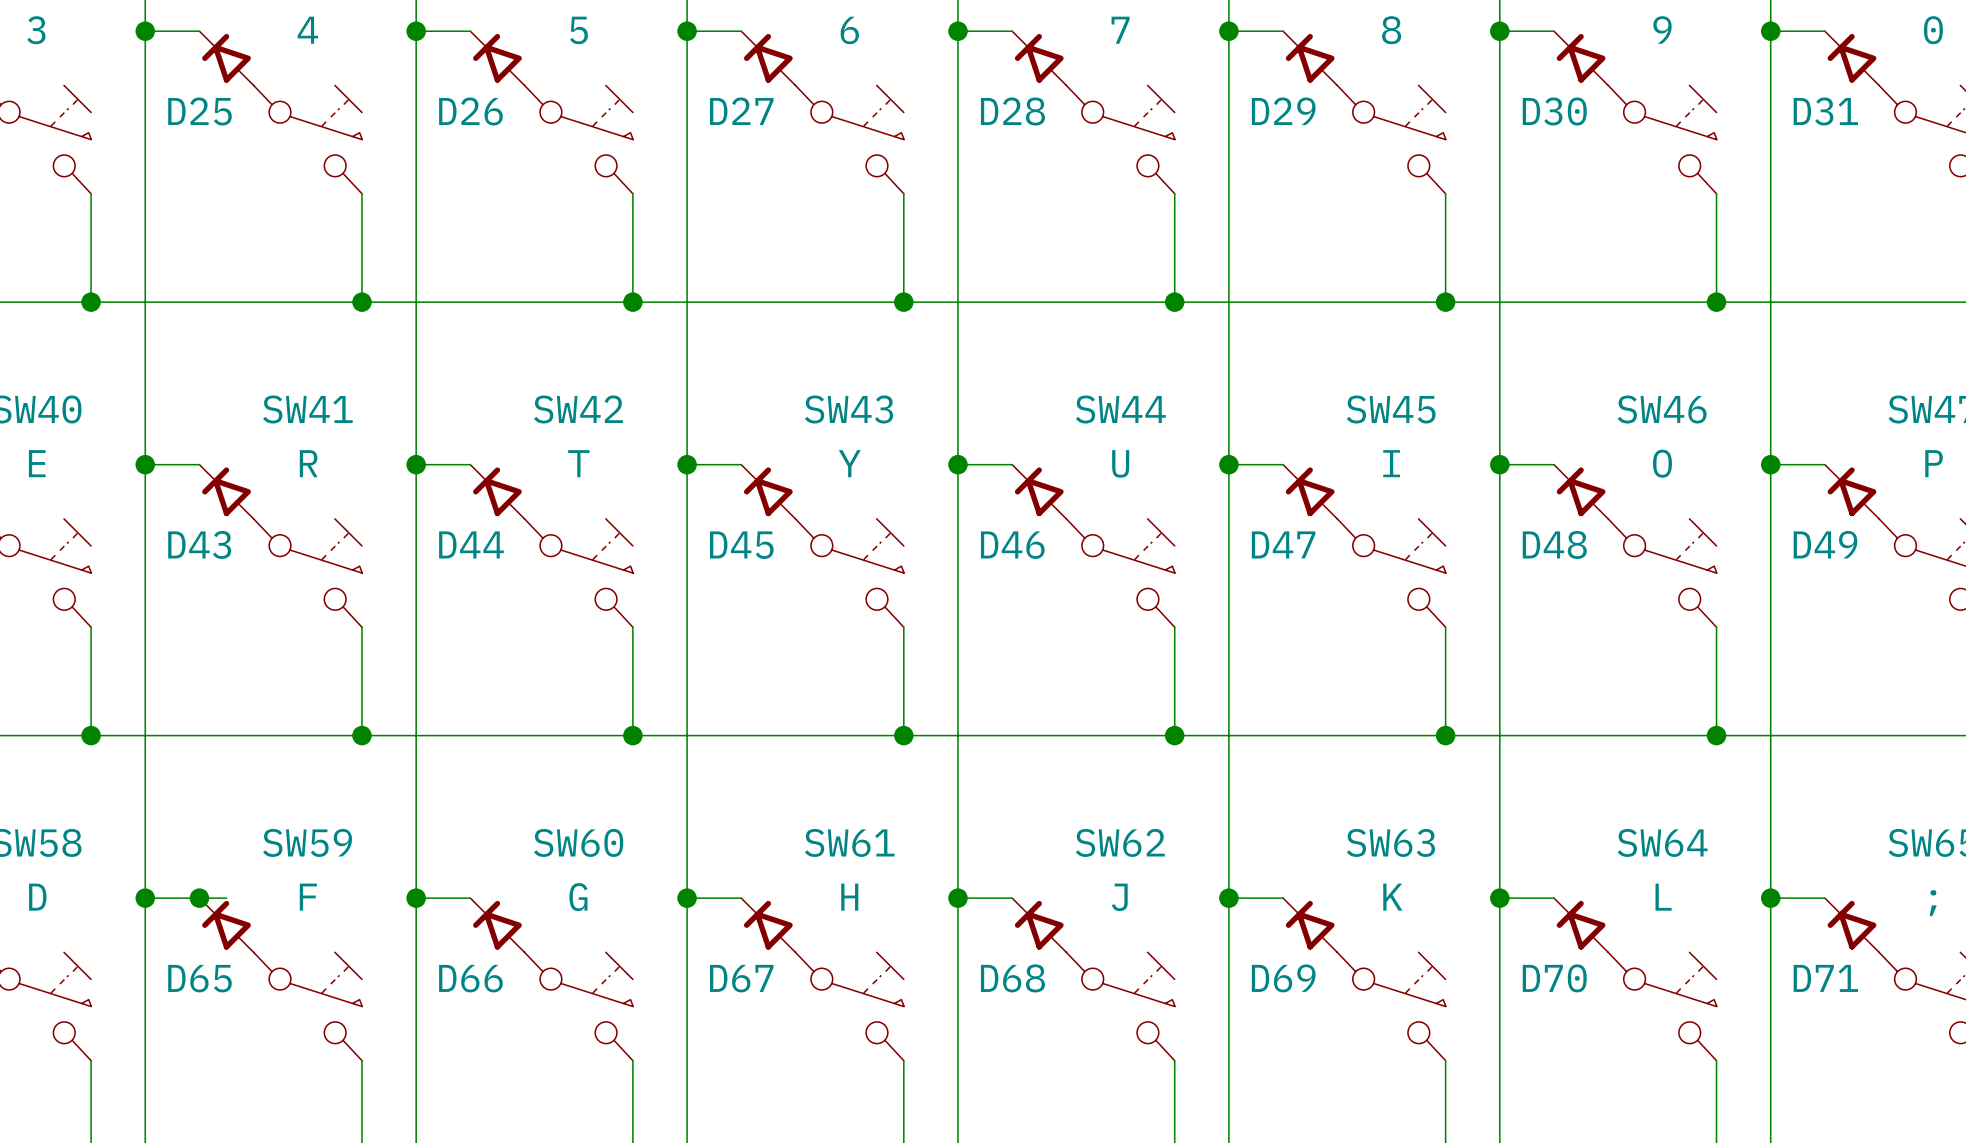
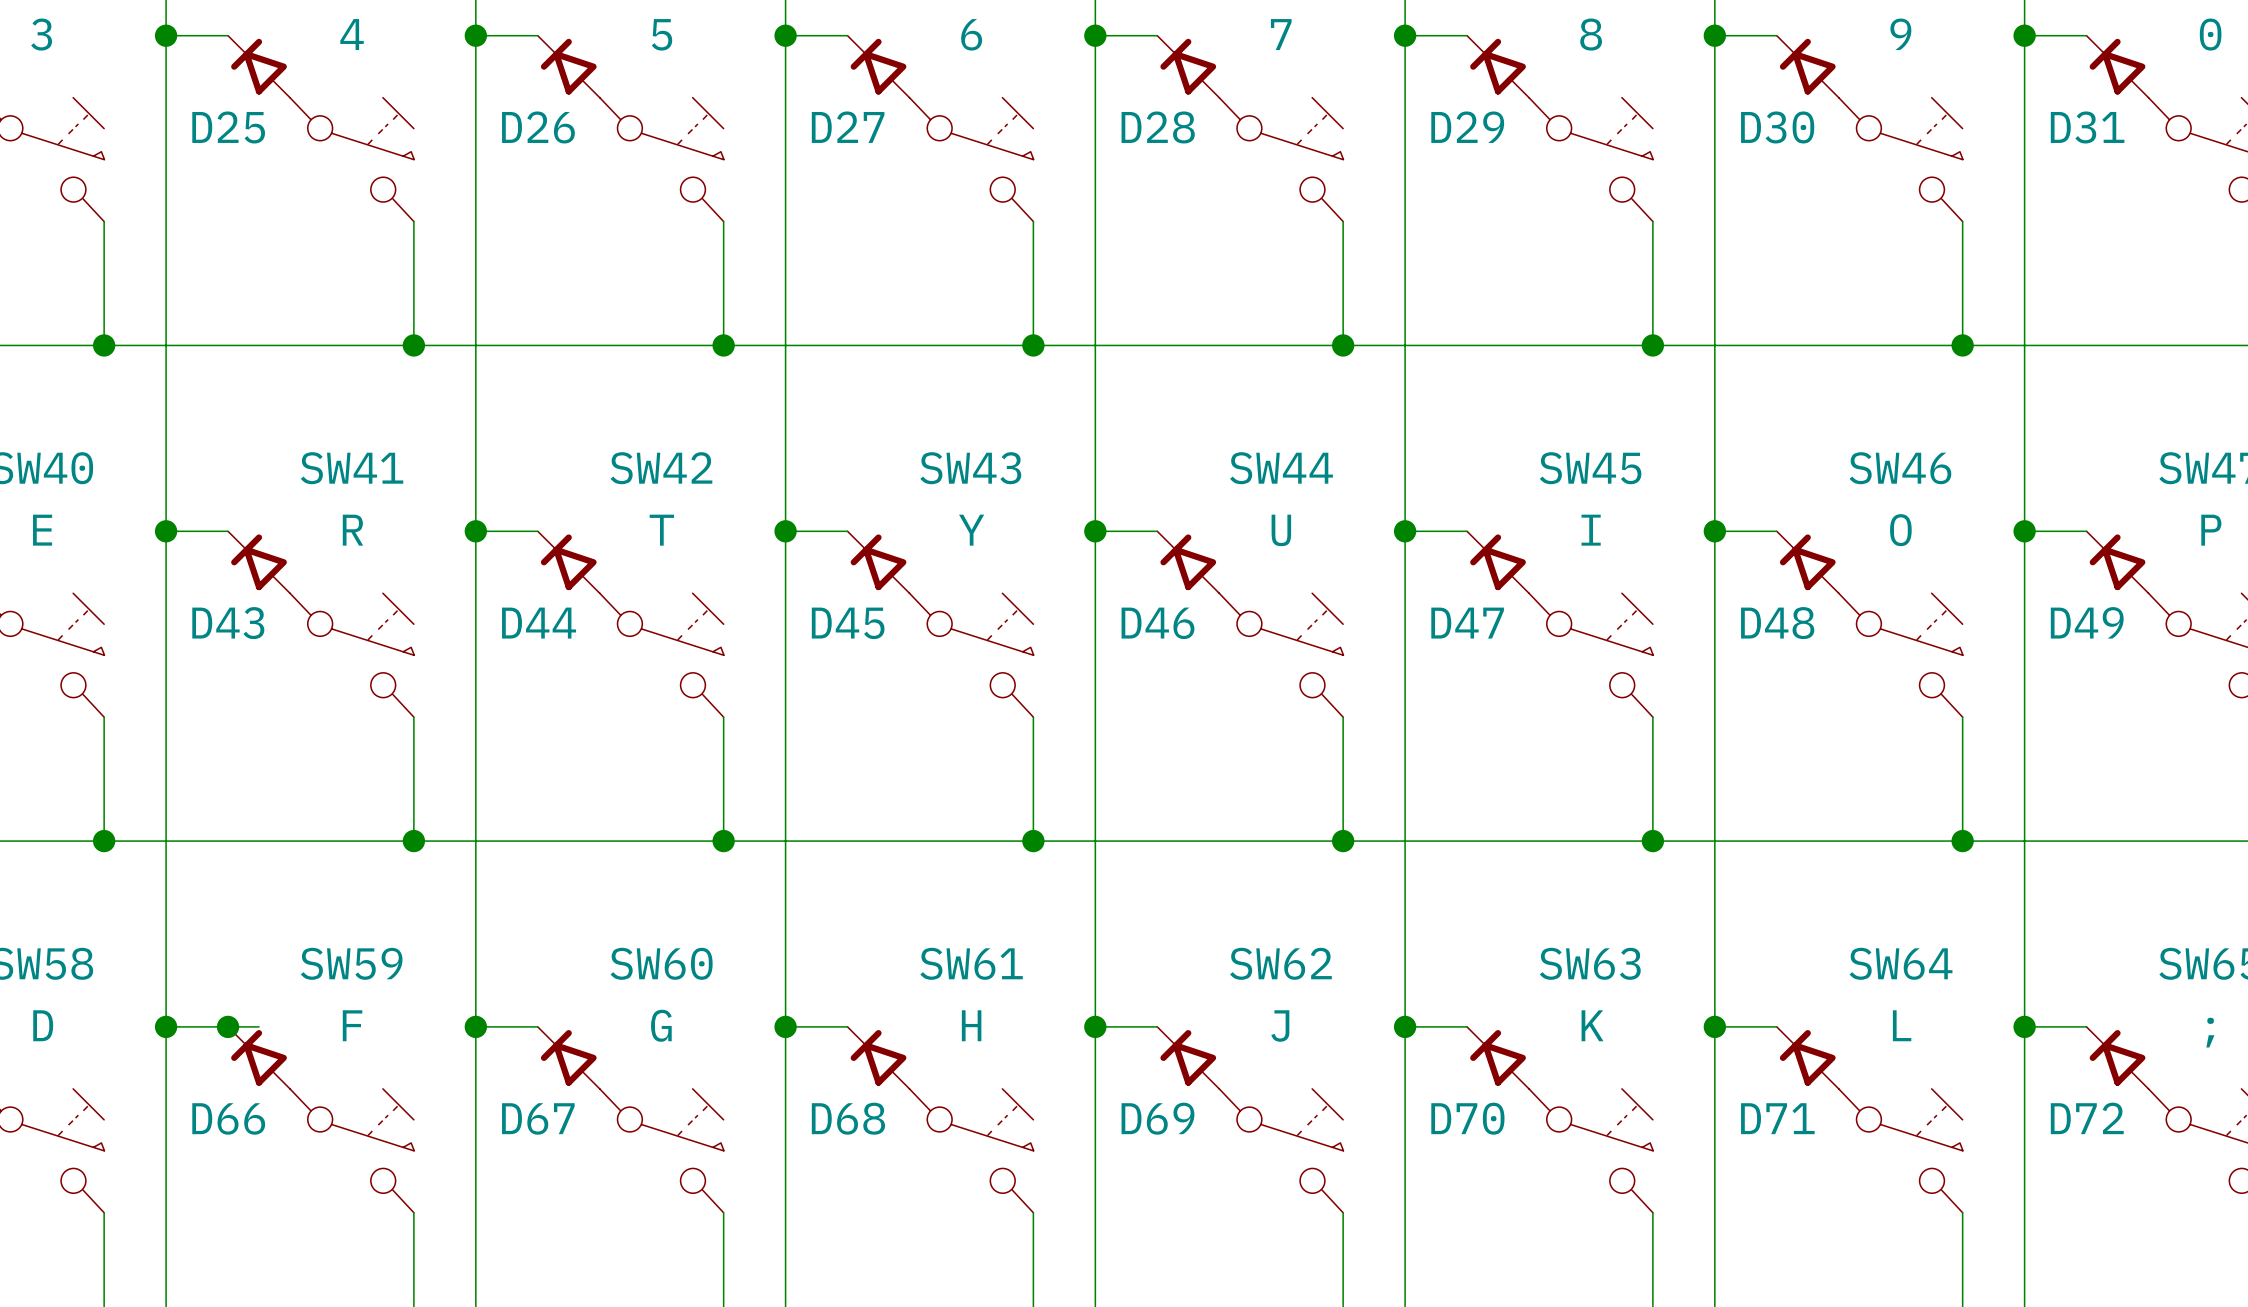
D65 name: D65 (199, 978) -> D66 (228, 1118)
D66 name: D66 (470, 978) -> D67 (538, 1118)
D67 name: D67 (741, 978) -> D68 (848, 1118)
D68 name: D68 (1012, 978) -> D69 (1157, 1118)
D69 name: D69 (1283, 978) -> D70 (1467, 1118)
D70 name: D70 (1554, 978) -> D71 (1777, 1118)
D71 name: D71 (1825, 978) -> D72 (2087, 1118)

